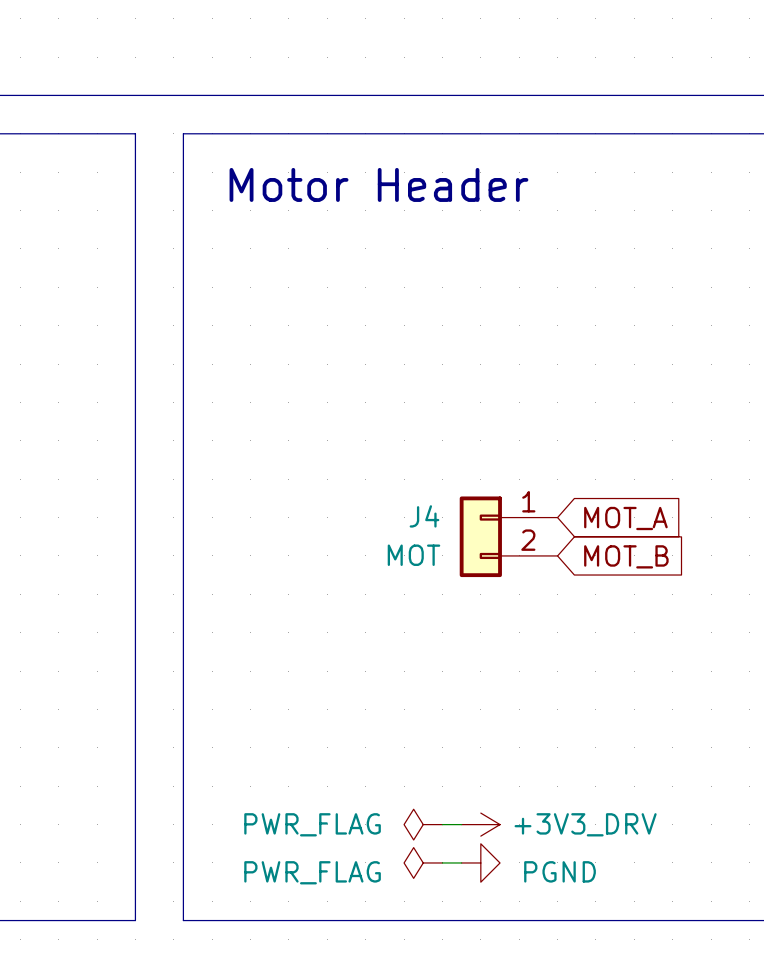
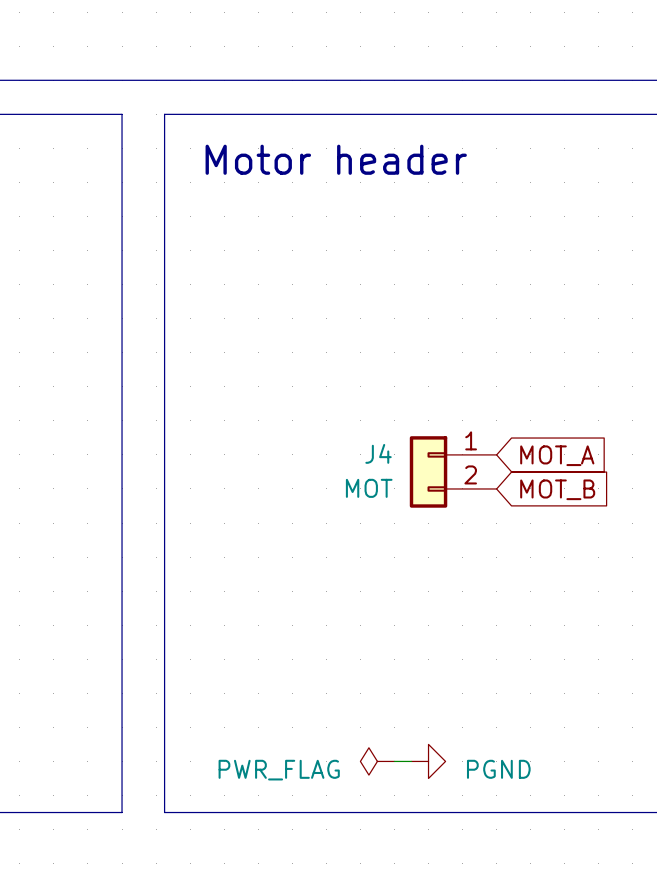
text: Motor Header (378, 184) -> Motor header (336, 159)
power symbol: PWR_FLAG (423, 824) -> none
wire: (442, 824) (461, 824) -> none
power symbol: +3V3_DRV (480, 824) -> none

